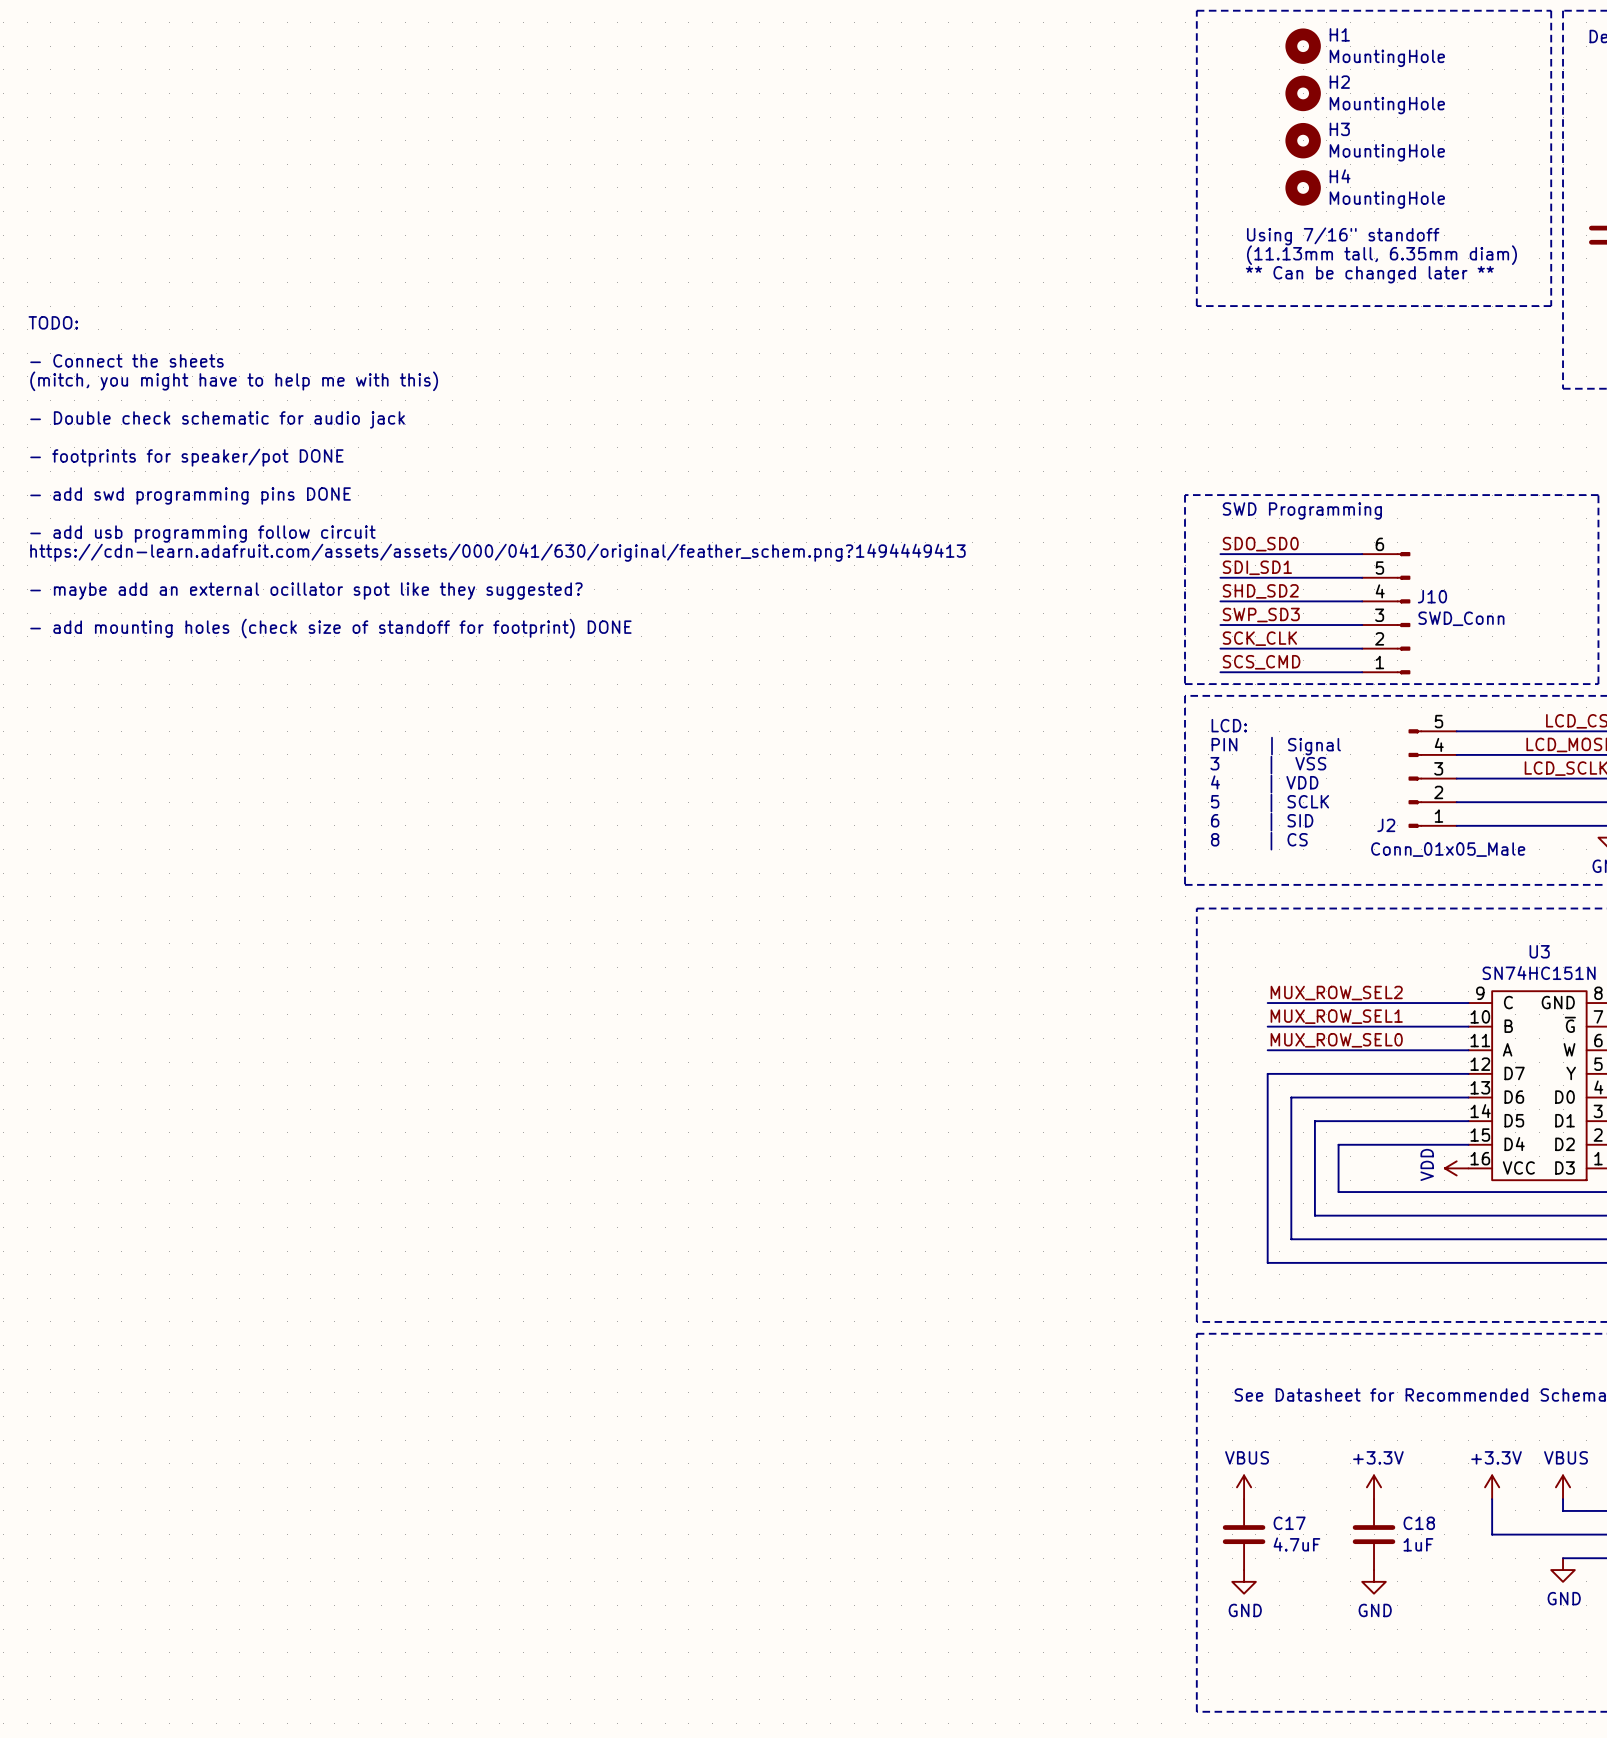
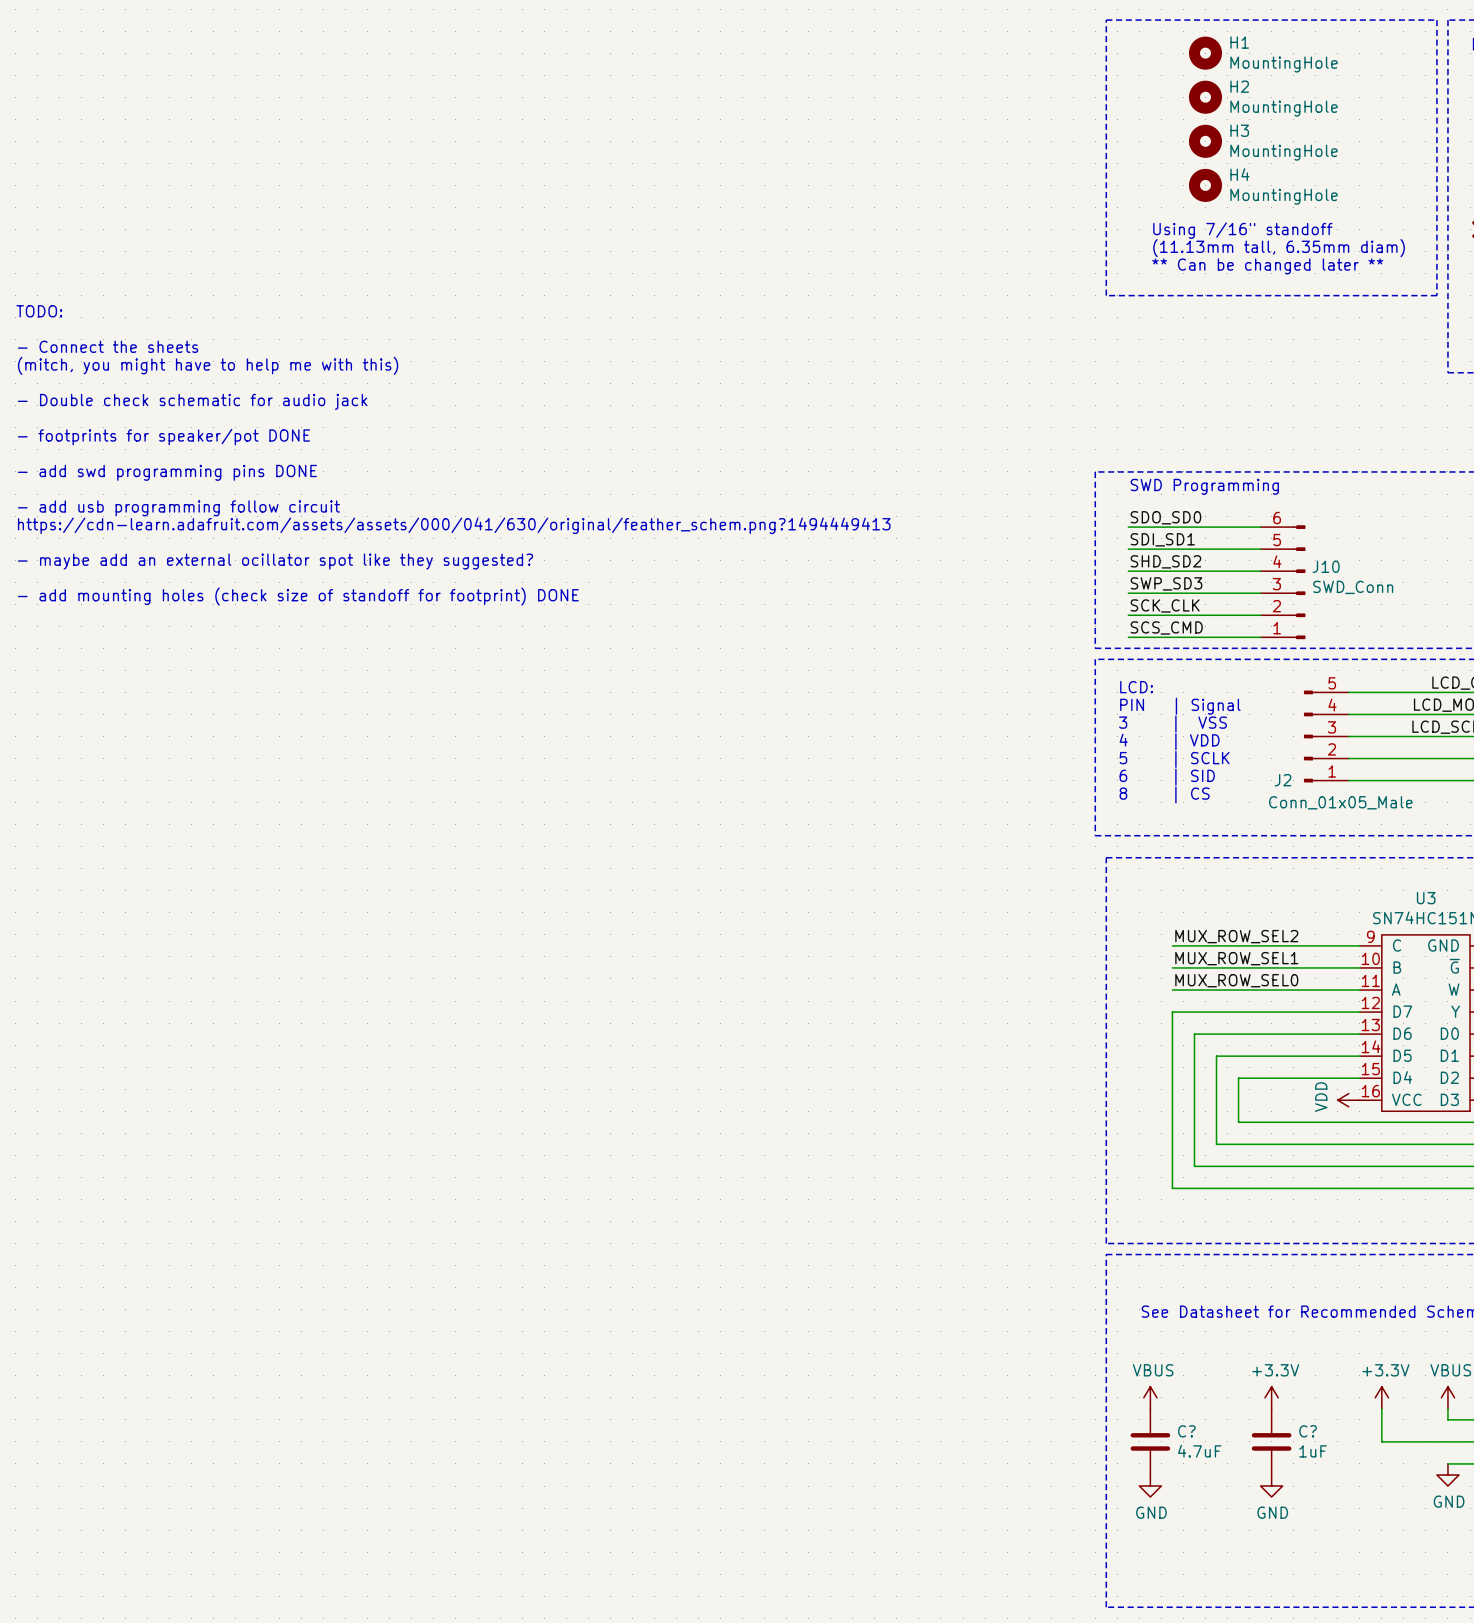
C17 name: C17 (1289, 1523) -> C? (1186, 1431)
C18 name: C18 (1419, 1523) -> C? (1308, 1431)

